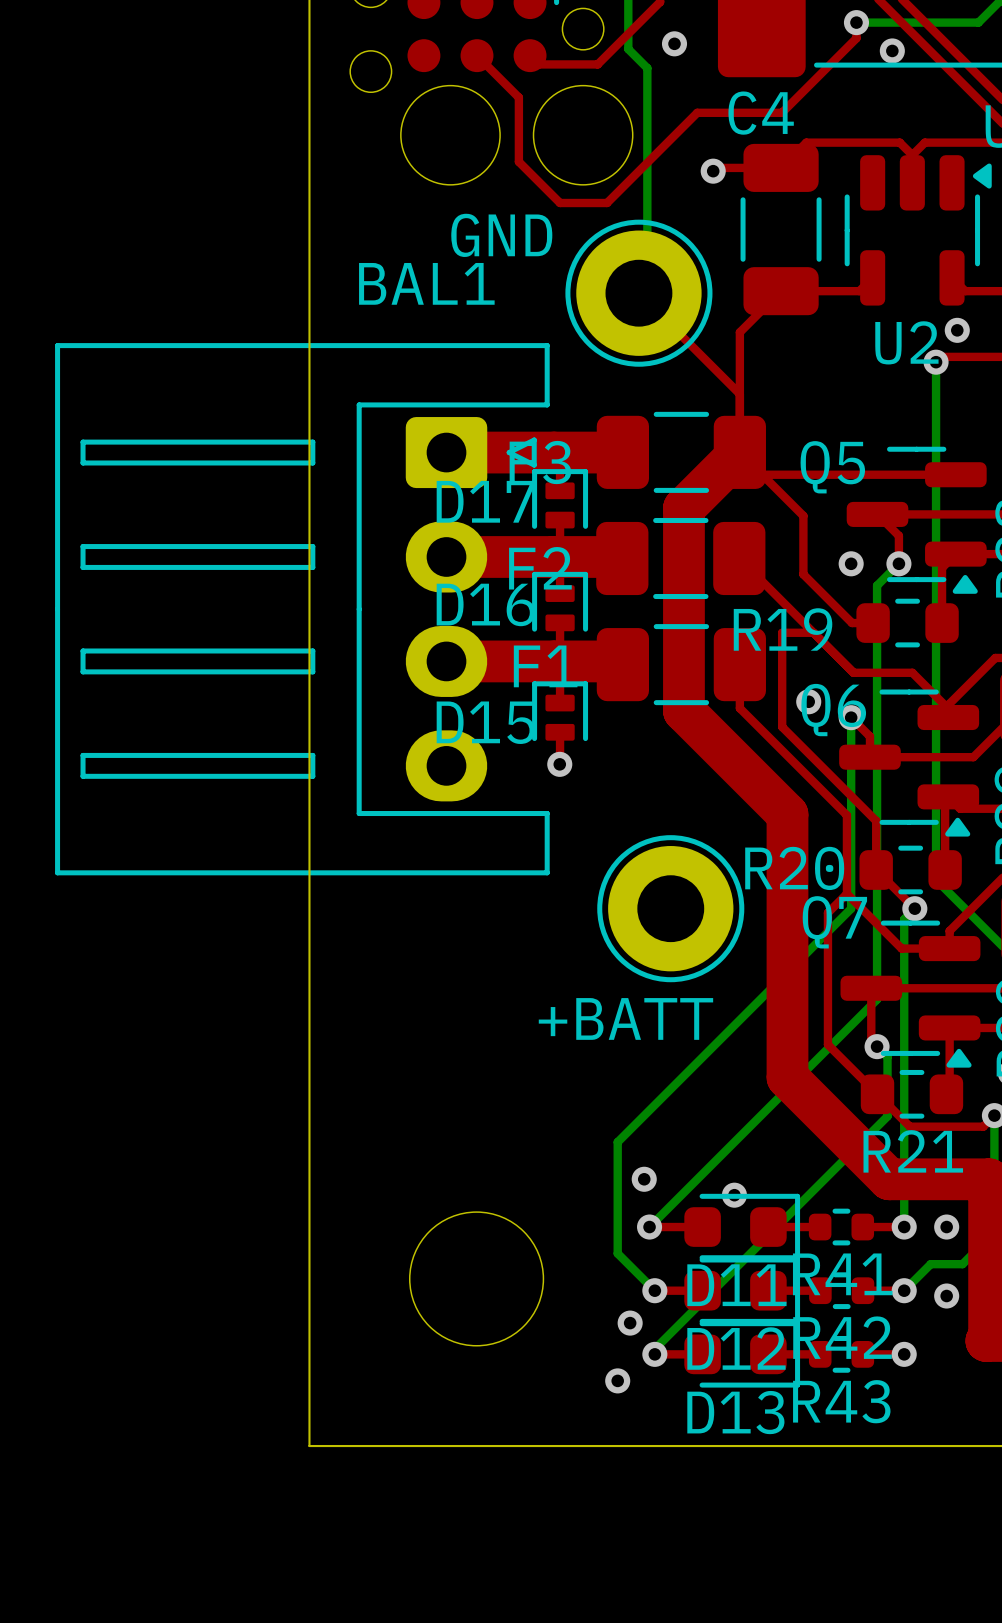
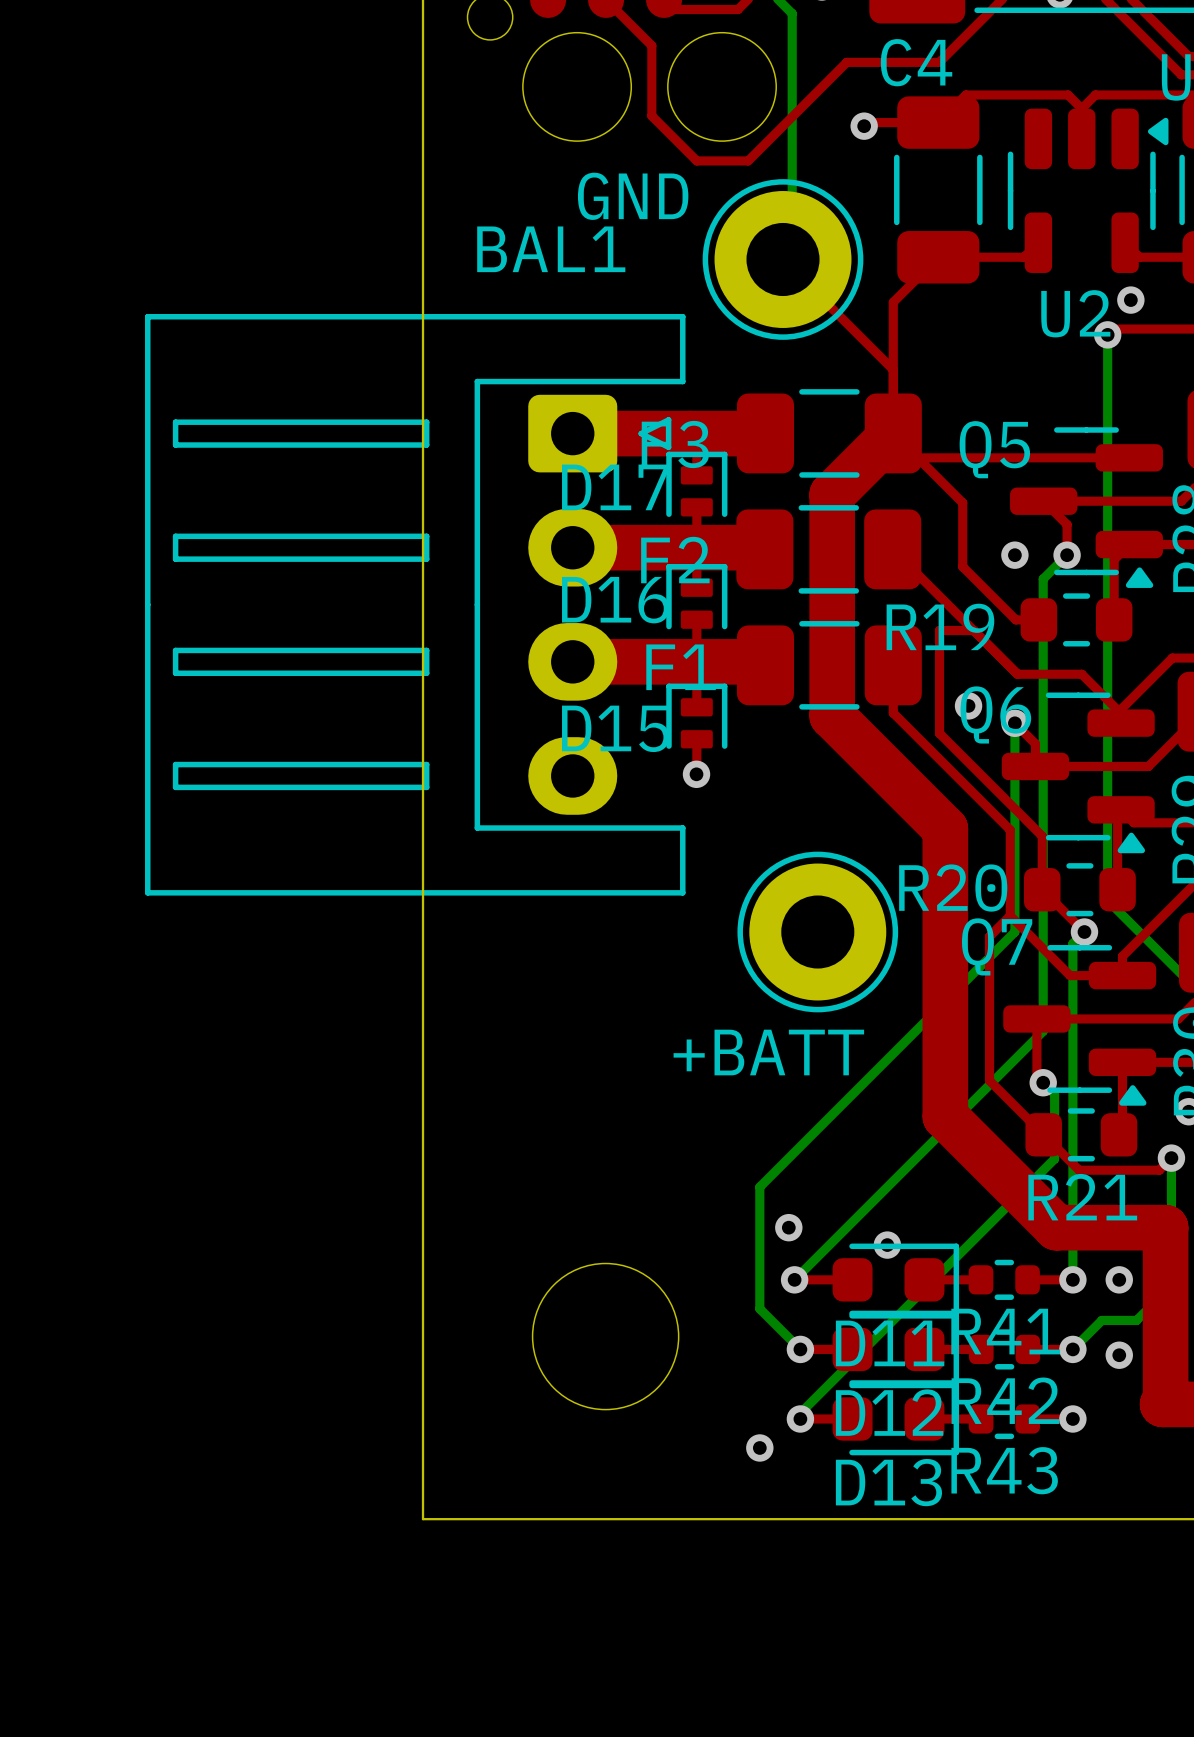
via: (630, 1323) -> none

